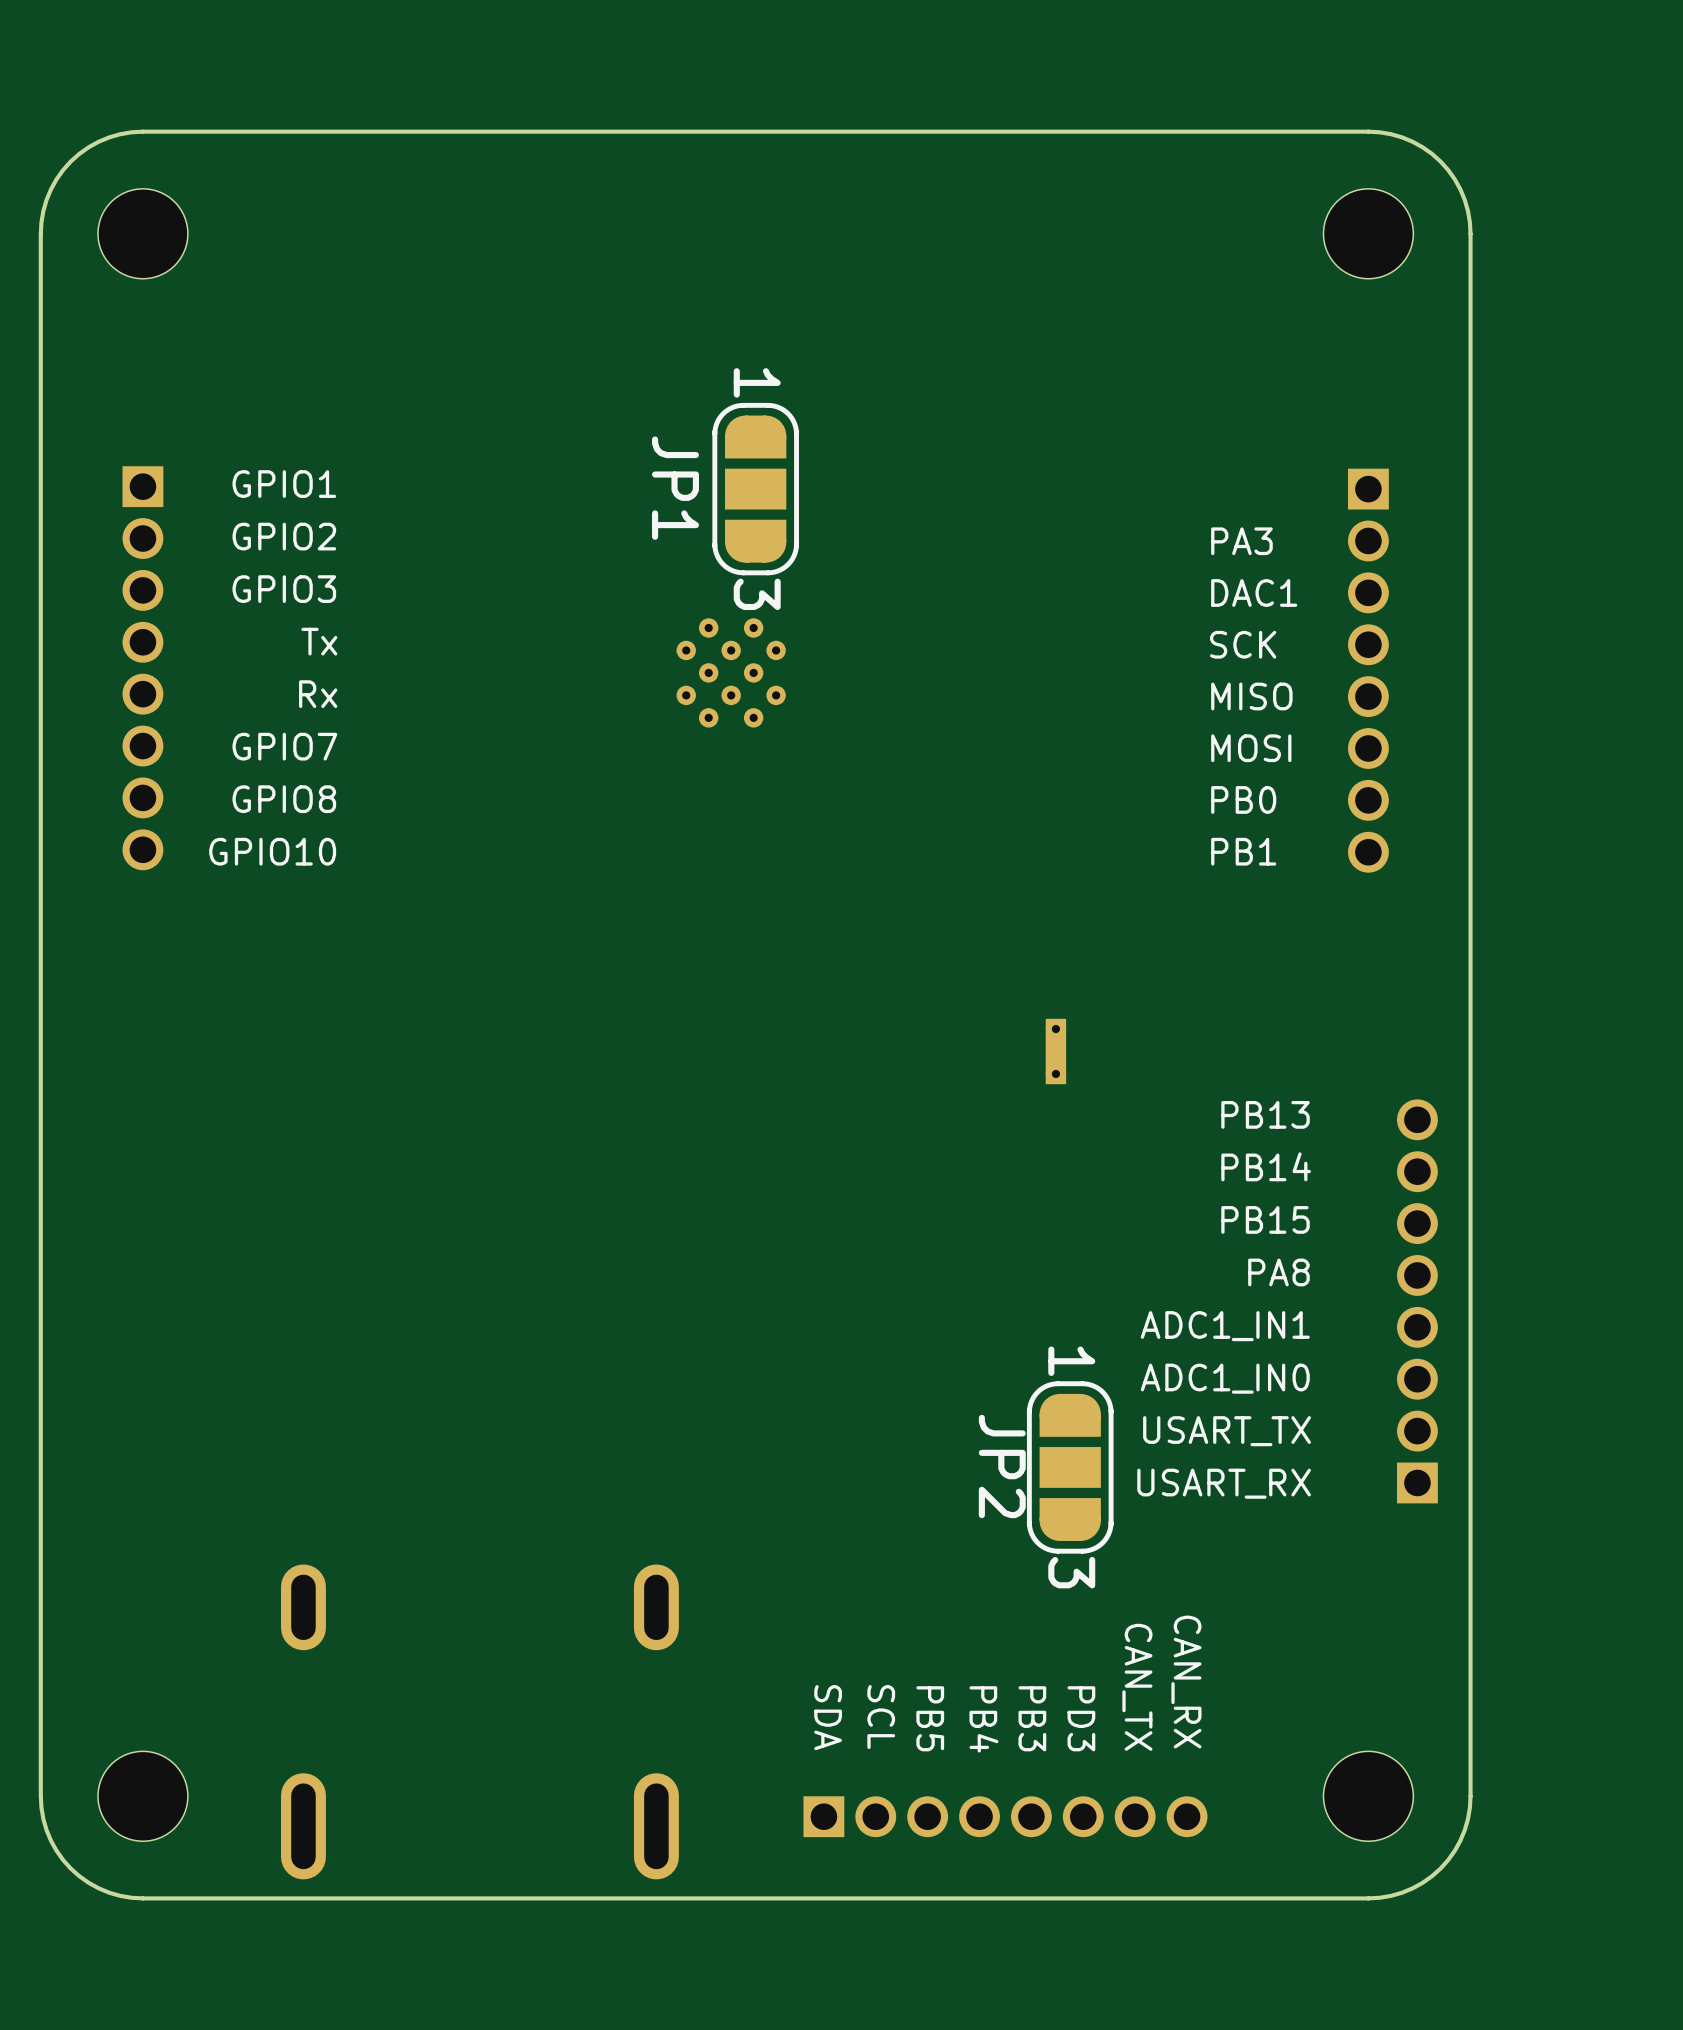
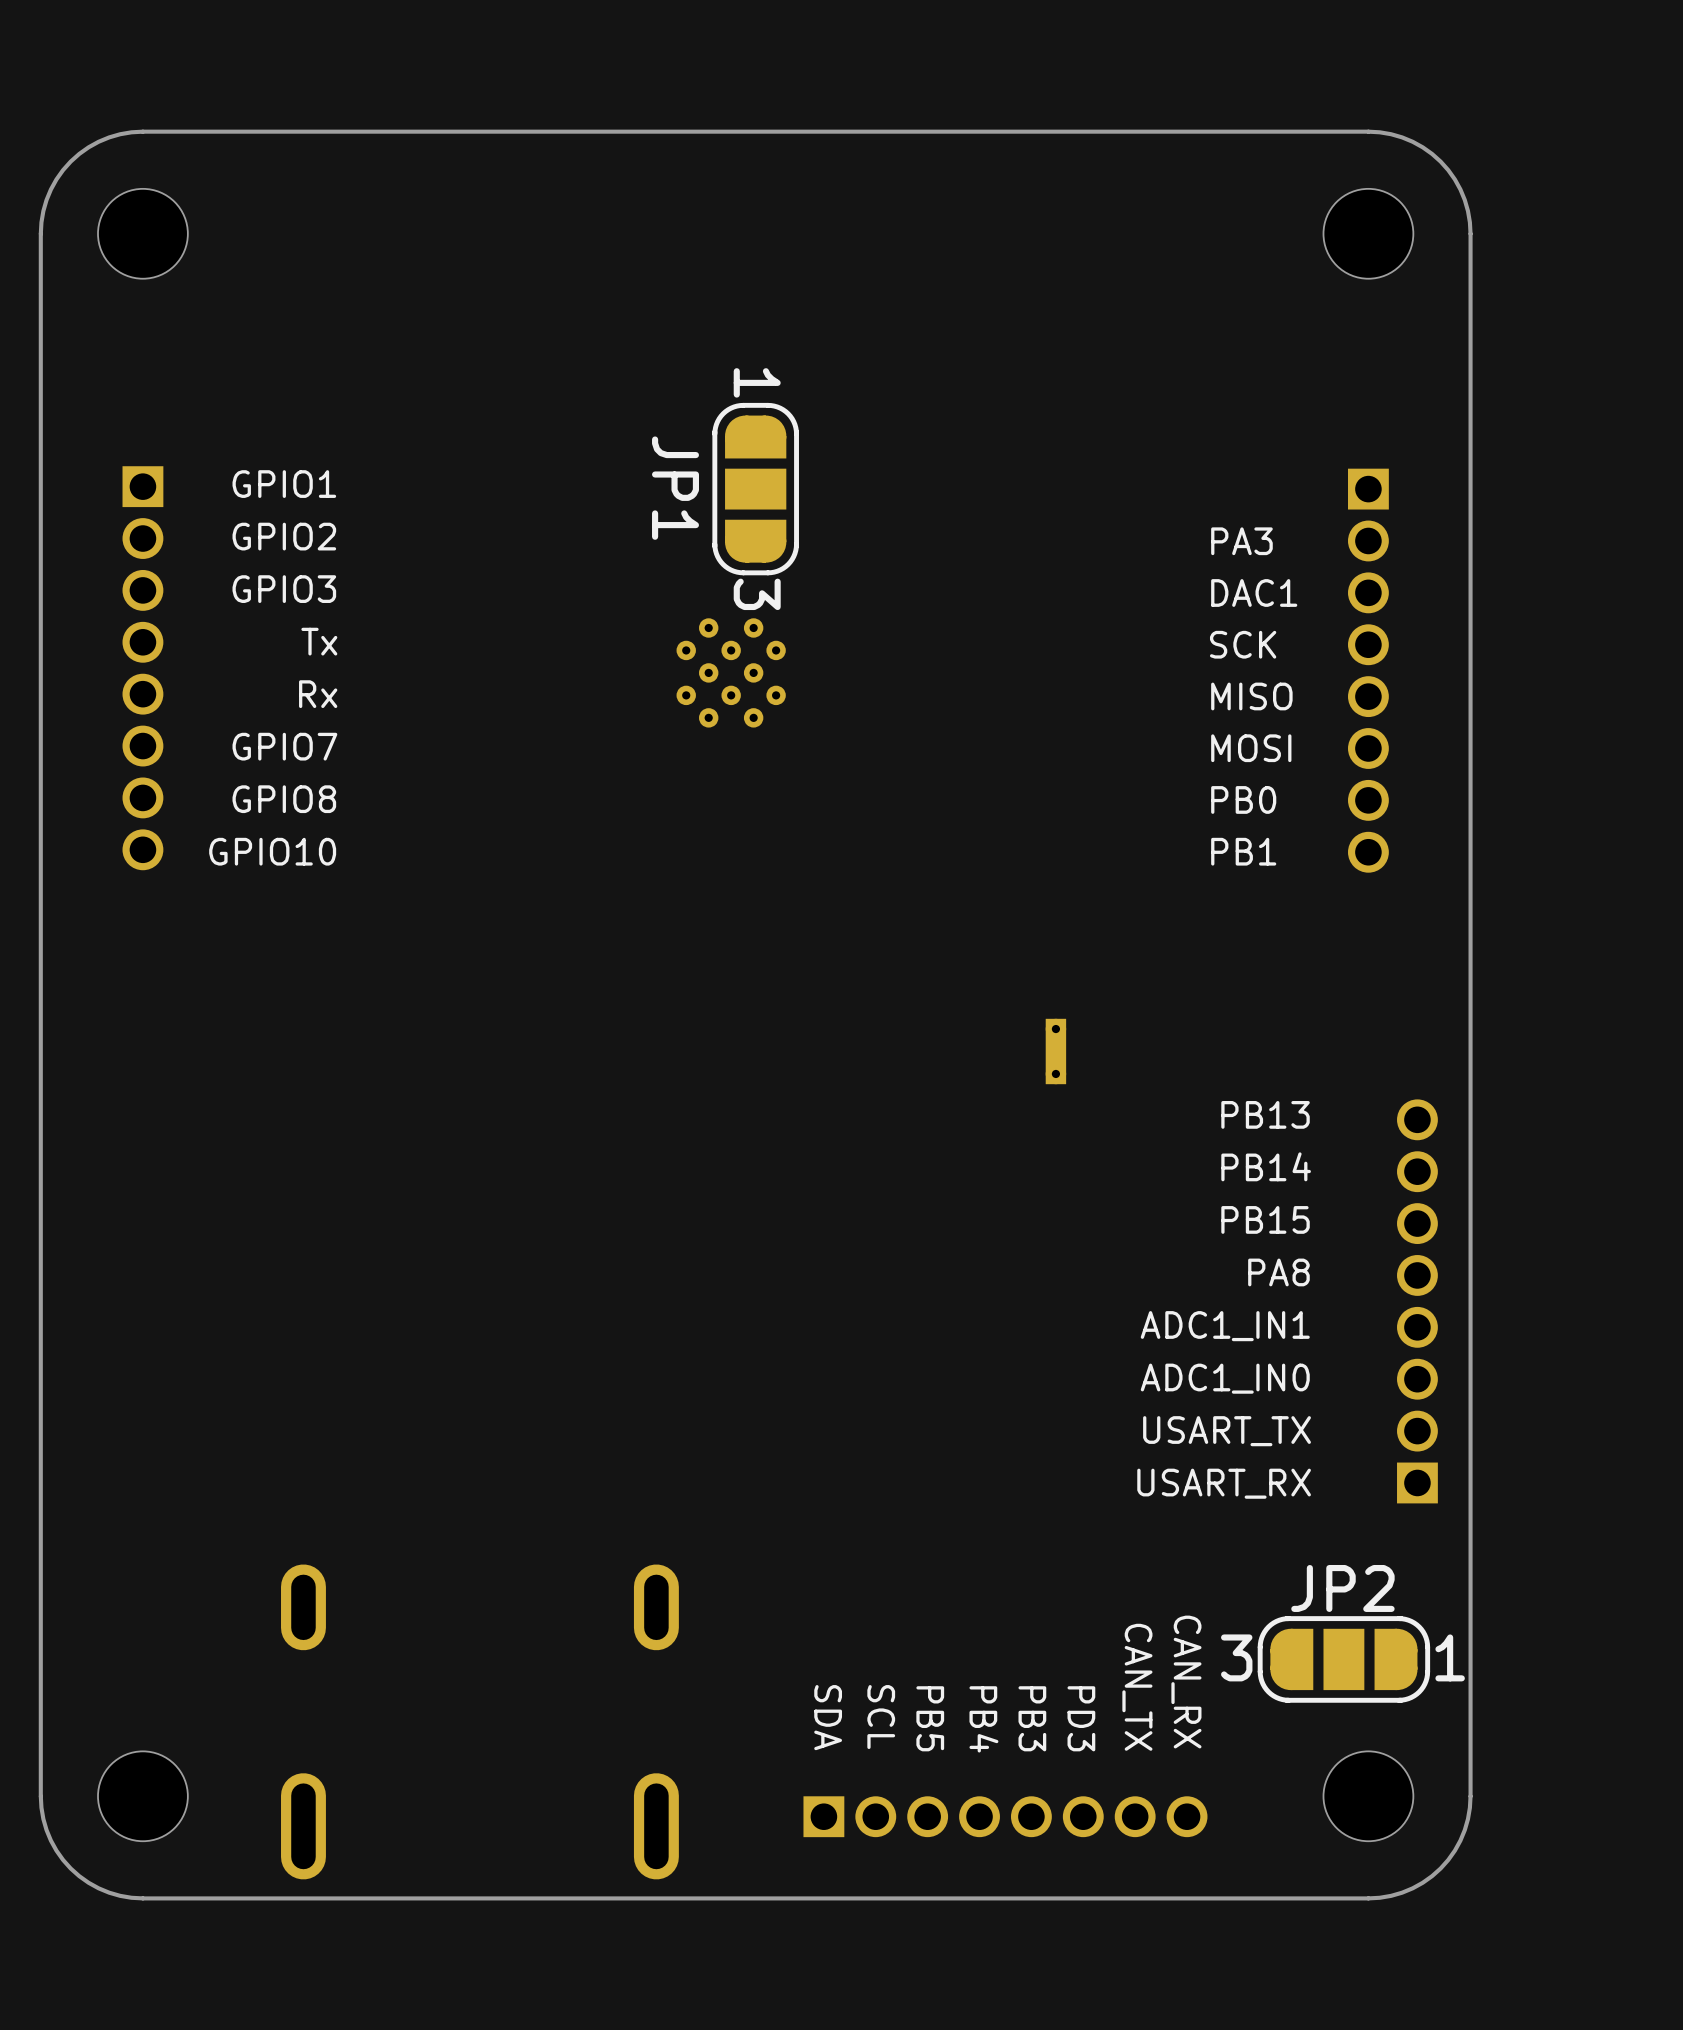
JP2 rotation: 0° (1070, 1467) -> 90° clockwise (1343, 1659)
JP2 position: (1070, 1467) -> (1343, 1659)

